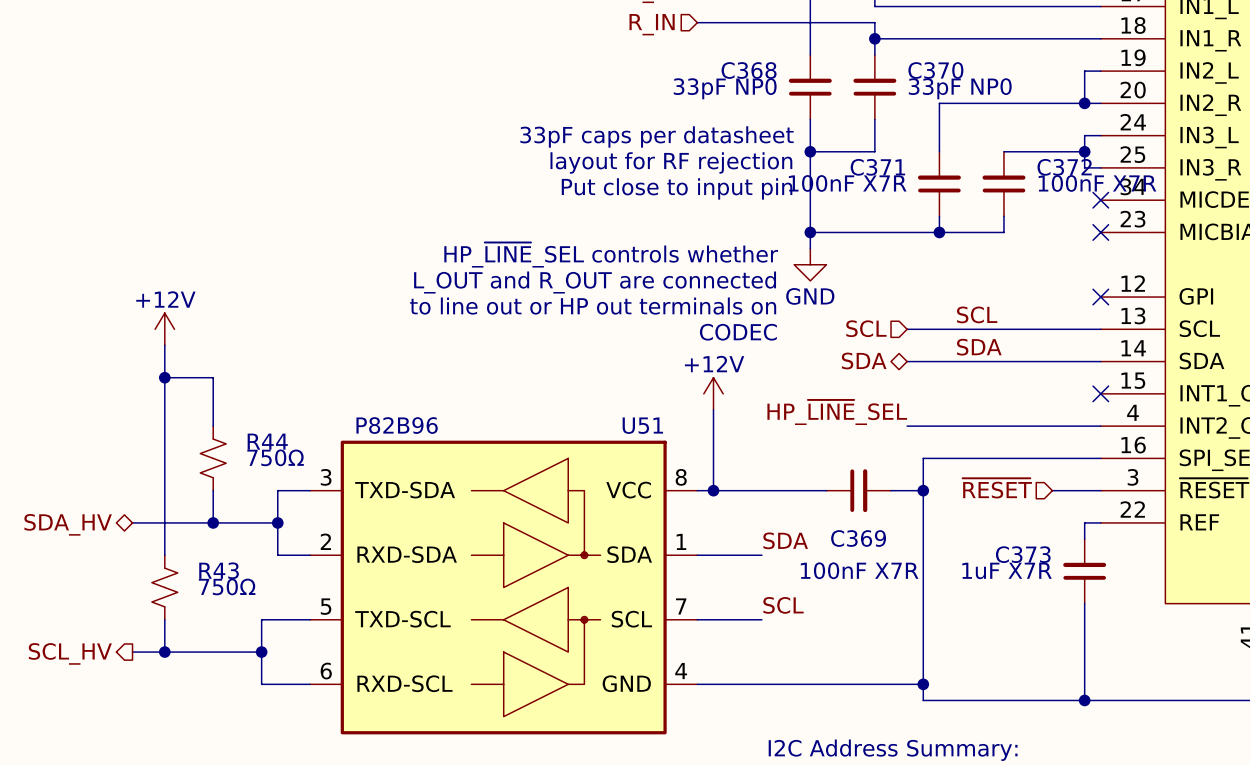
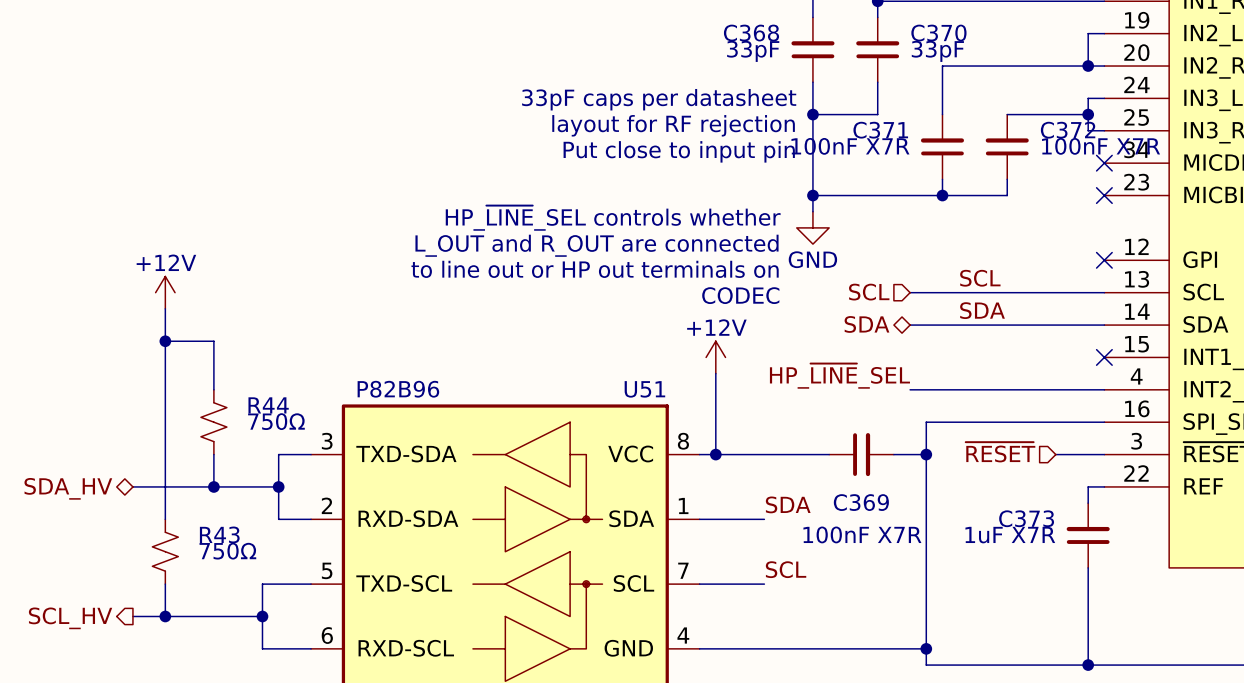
C368 value: 33pF NP0 (725, 88) -> 33pF (753, 51)
C370 value: 33pF NP0 (960, 88) -> 33pF (937, 51)

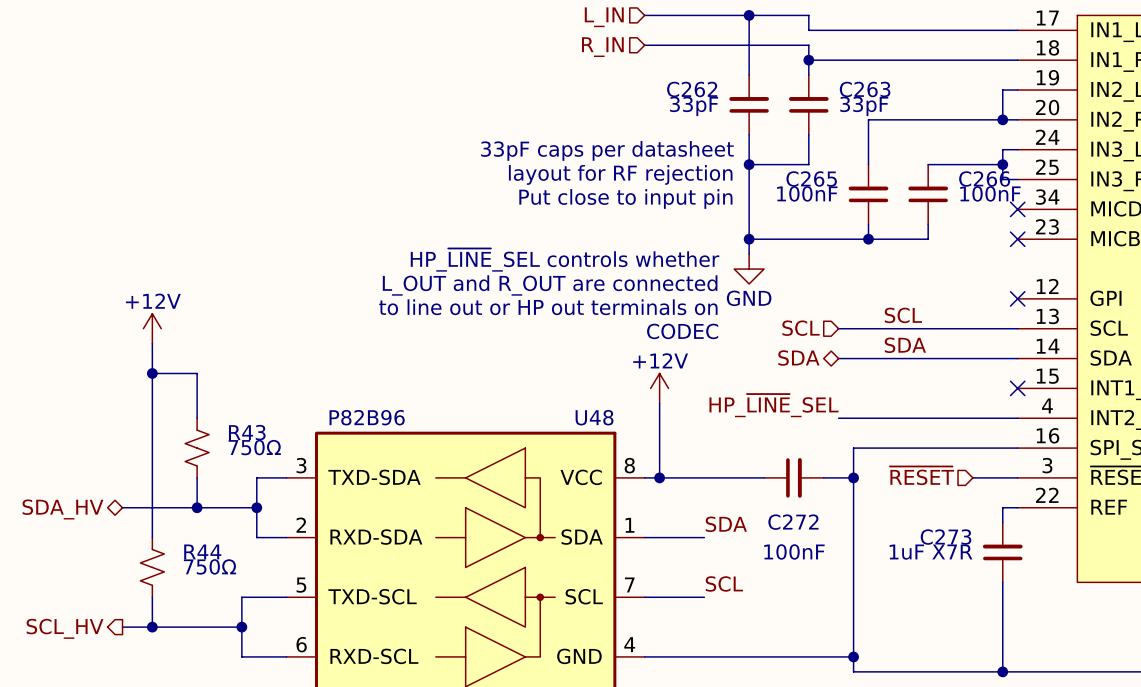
C368 name: C368 (751, 33) -> C262 (692, 89)
C370 name: C370 (938, 33) -> C263 (865, 89)
C371 name: C371 (880, 130) -> C265 (811, 178)
C372 name: C372 (1068, 130) -> C266 (984, 178)
C371 value: 100nF X7R (850, 146) -> 100nF (807, 193)
C372 value: 100nF X7R (1101, 146) -> 100nF (990, 193)
U51 name: U51 (644, 389) -> U48 (594, 417)
R44 name: R44 (268, 405) -> R43 (247, 432)
C369 name: C369 (861, 502) -> C272 (793, 522)
C373 name: C373 (1026, 518) -> C273 (946, 537)
R43 name: R43 (219, 534) -> R44 (202, 551)
C369 value: 100nF X7R (862, 534) -> 100nF (794, 551)

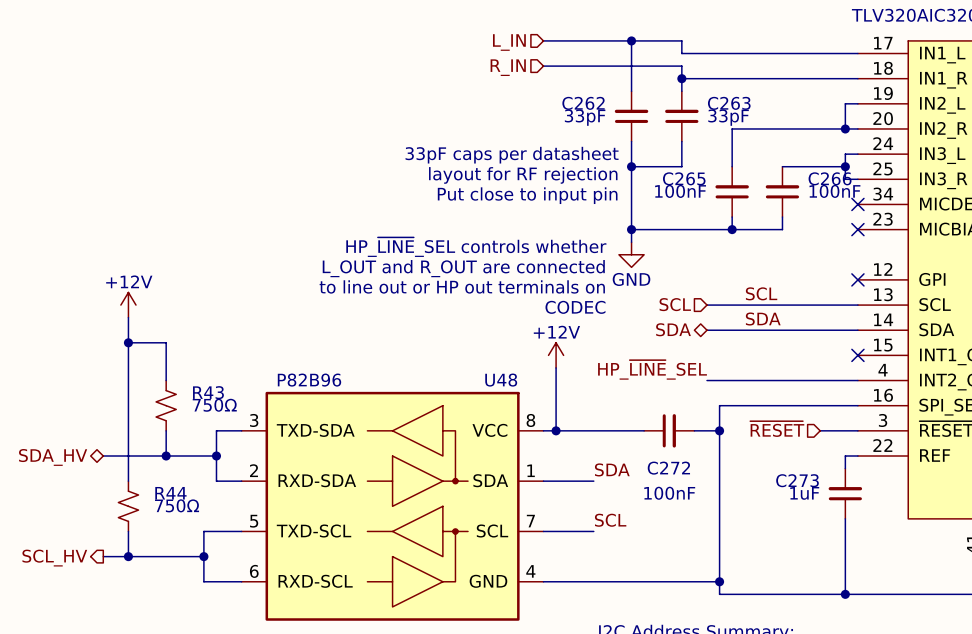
C273 value: 1uF X7R (931, 552) -> 1uF (804, 493)

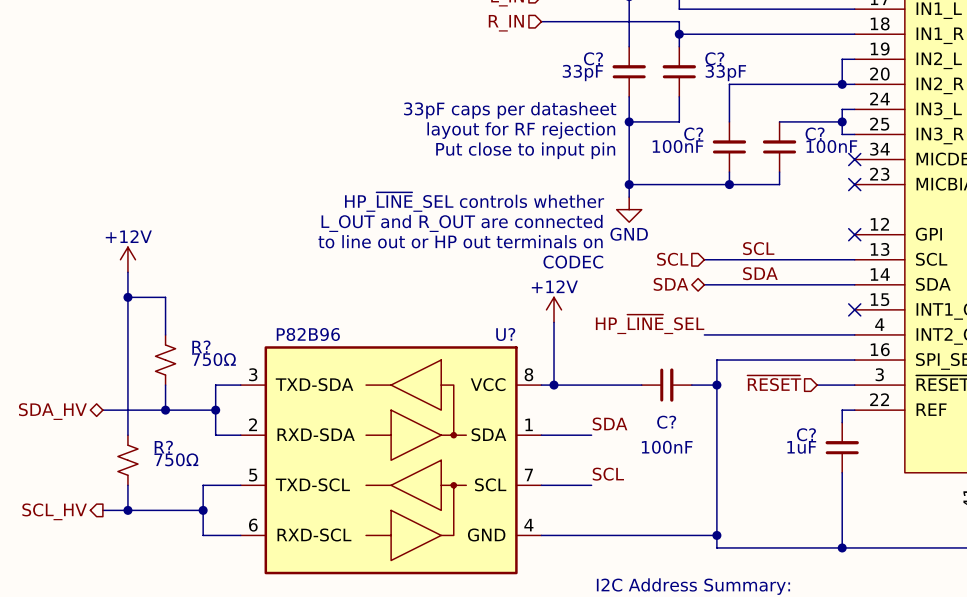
C262 name: C262 (583, 103) -> C? (593, 58)
C263 name: C263 (729, 103) -> C? (714, 58)
C265 name: C265 (684, 178) -> C? (693, 134)
C266 name: C266 (830, 178) -> C? (815, 134)
U48 name: U48 (501, 380) -> U? (505, 334)
R43 name: R43 (208, 392) -> R? (201, 346)
C272 name: C272 (668, 468) -> C? (666, 422)
C273 name: C273 (797, 480) -> C? (806, 434)
R44 name: R44 (170, 493) -> R? (163, 447)

